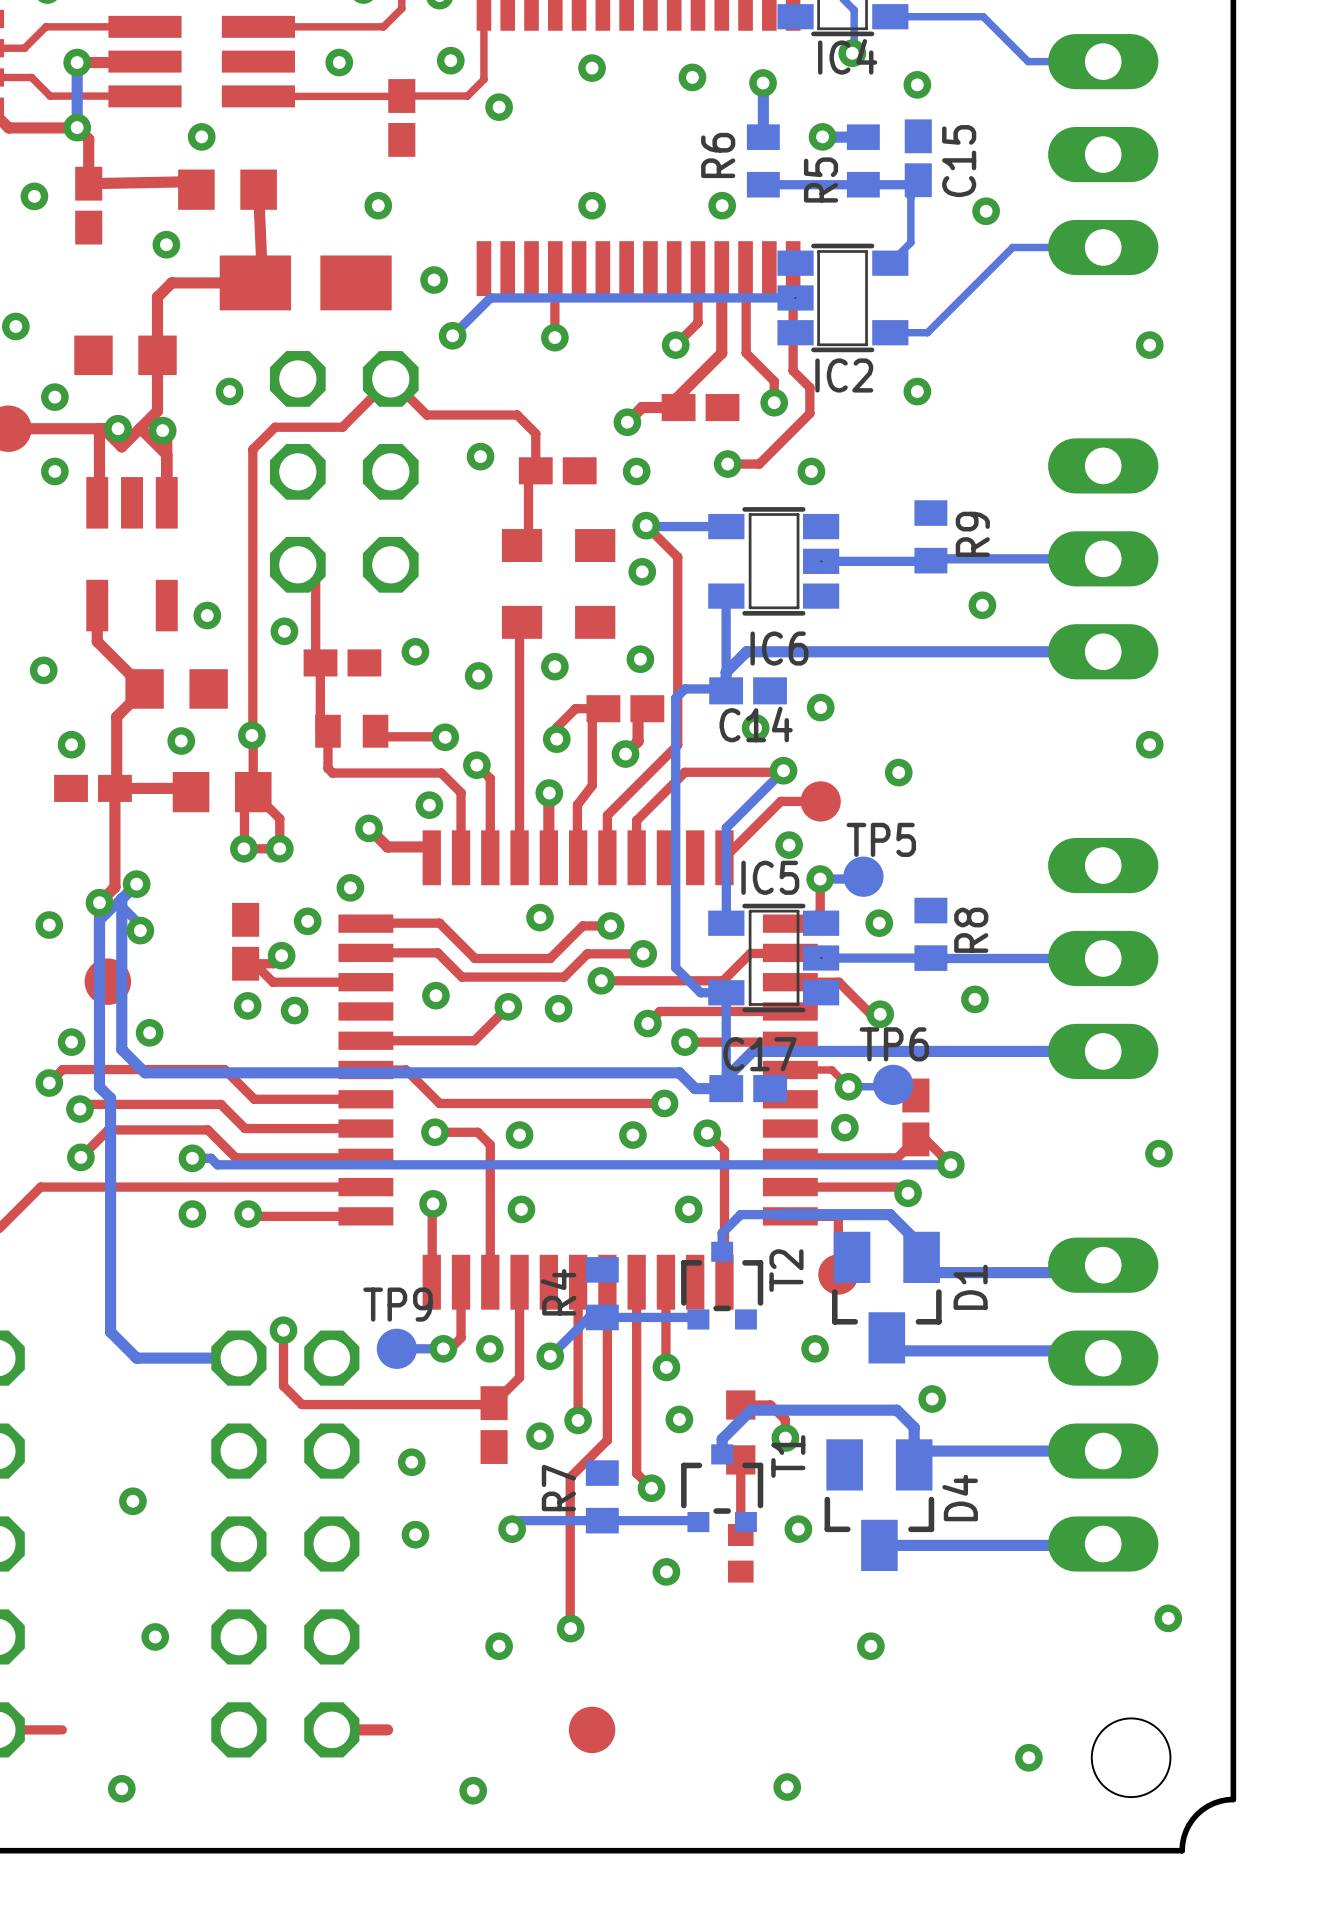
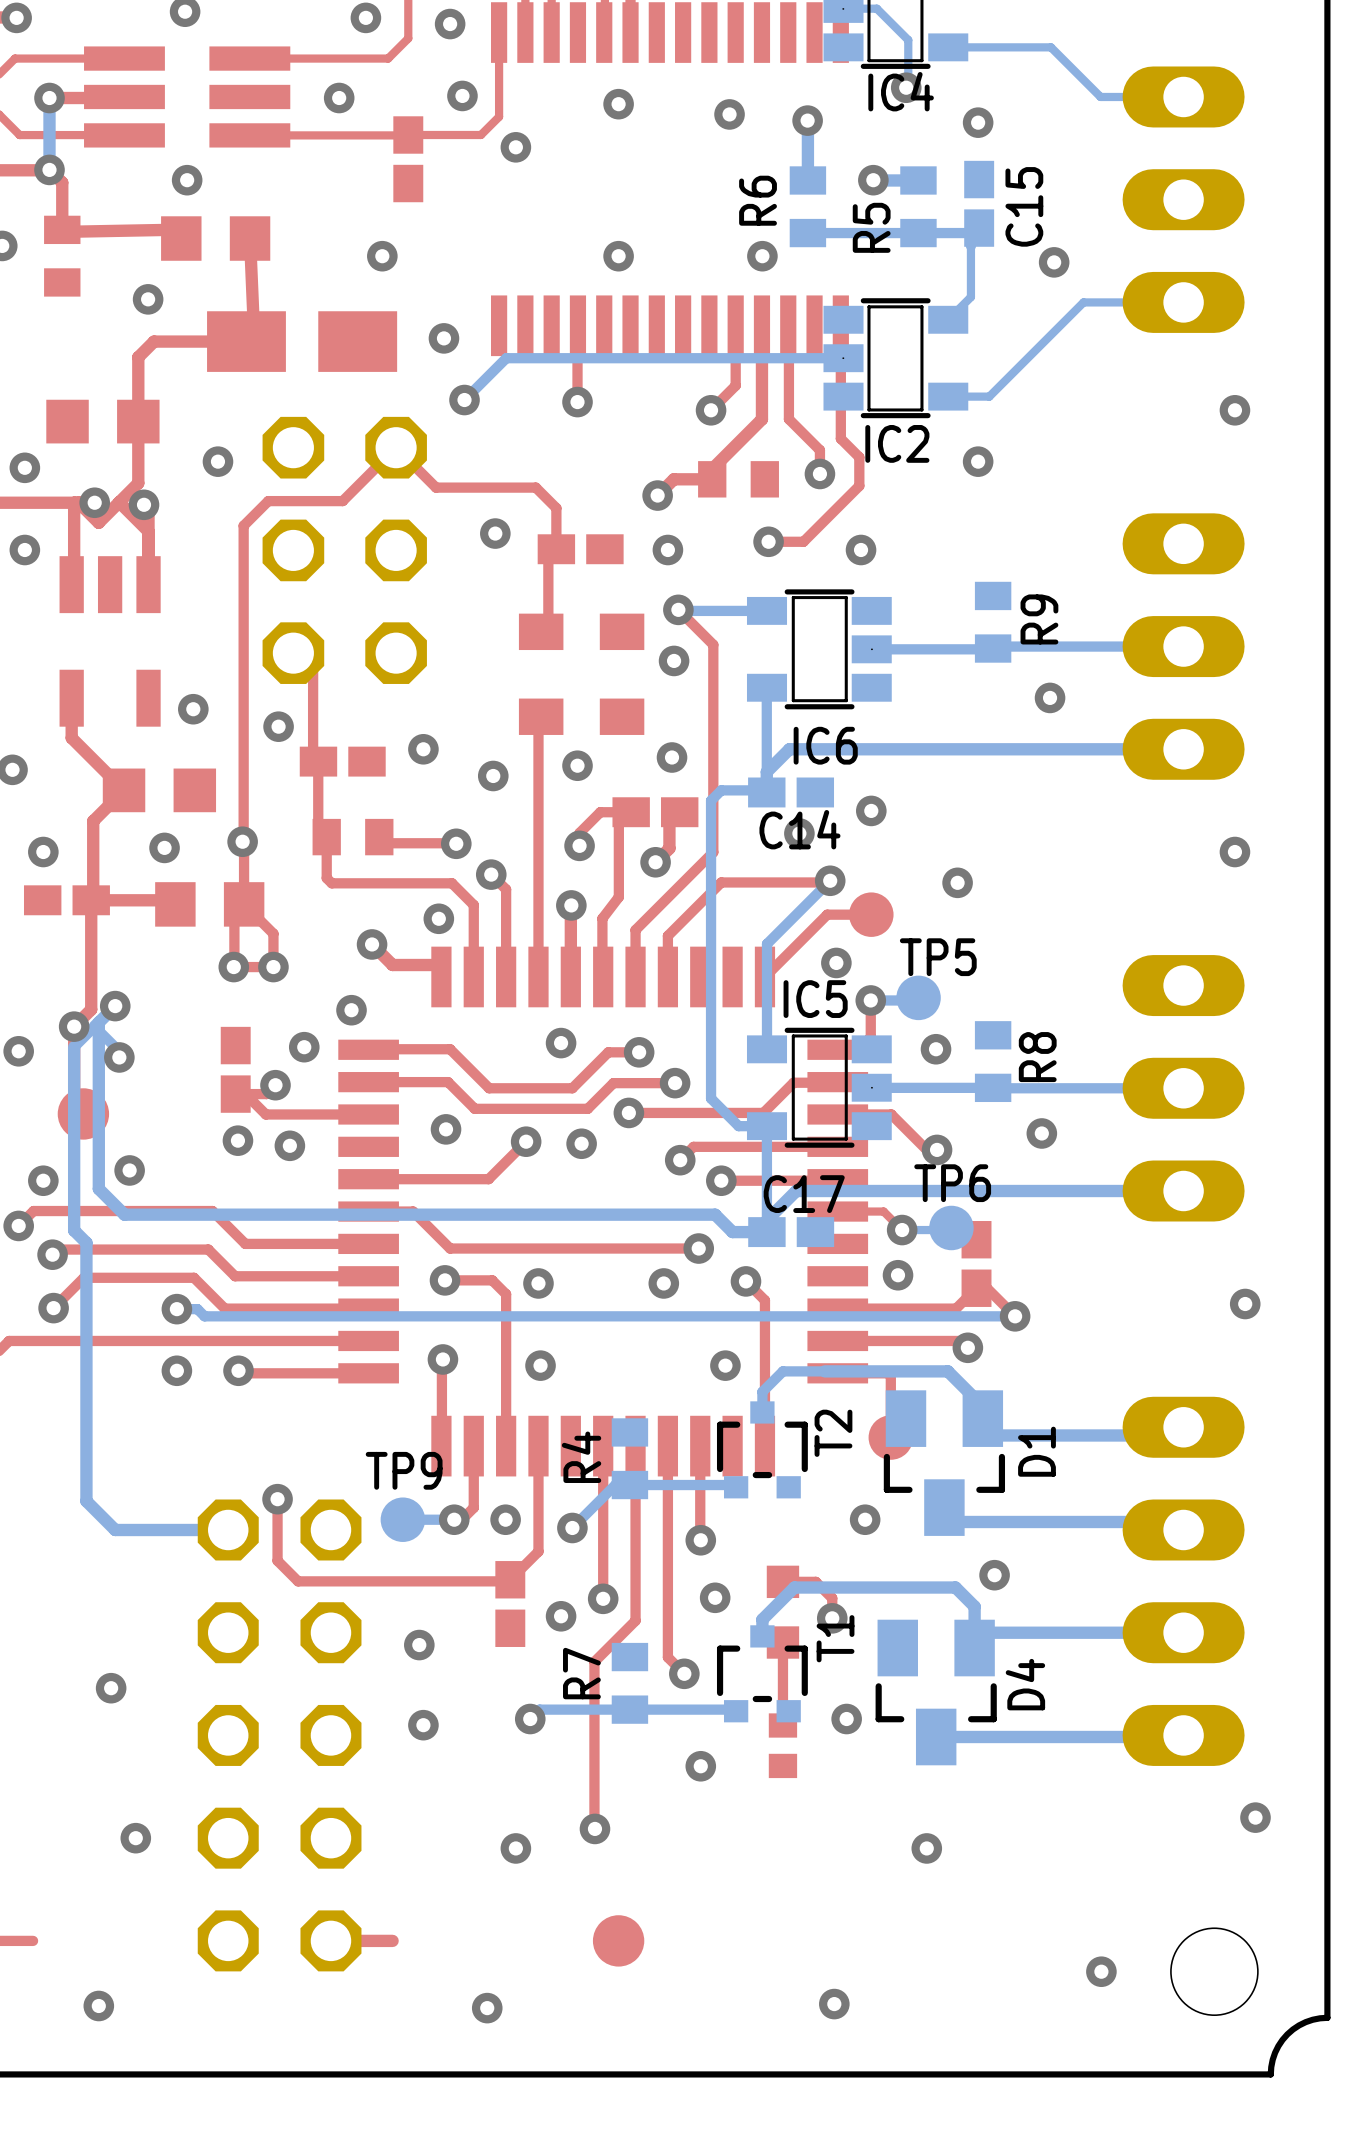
part footprint: [75, 166, 103, 245] -> [44, 215, 81, 297]
part footprint: [661, 393, 740, 422] -> [698, 461, 779, 498]

